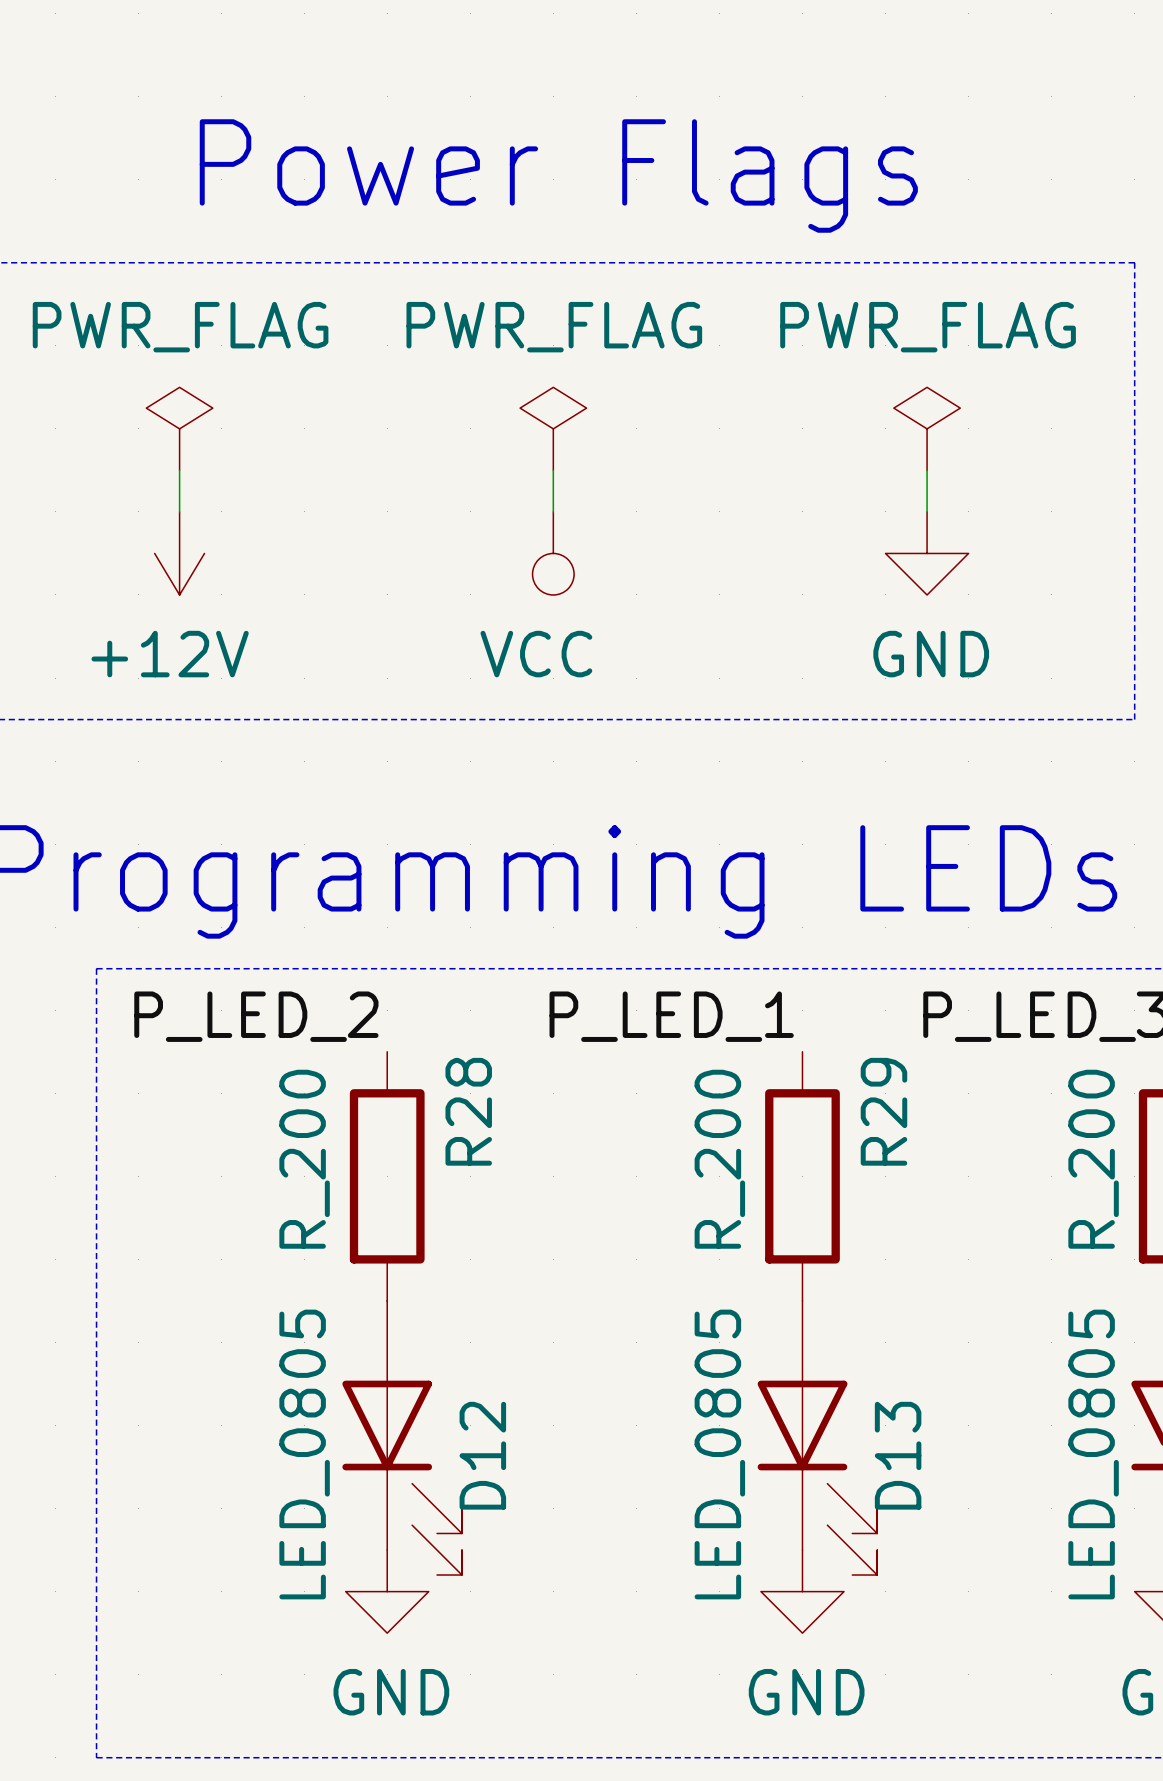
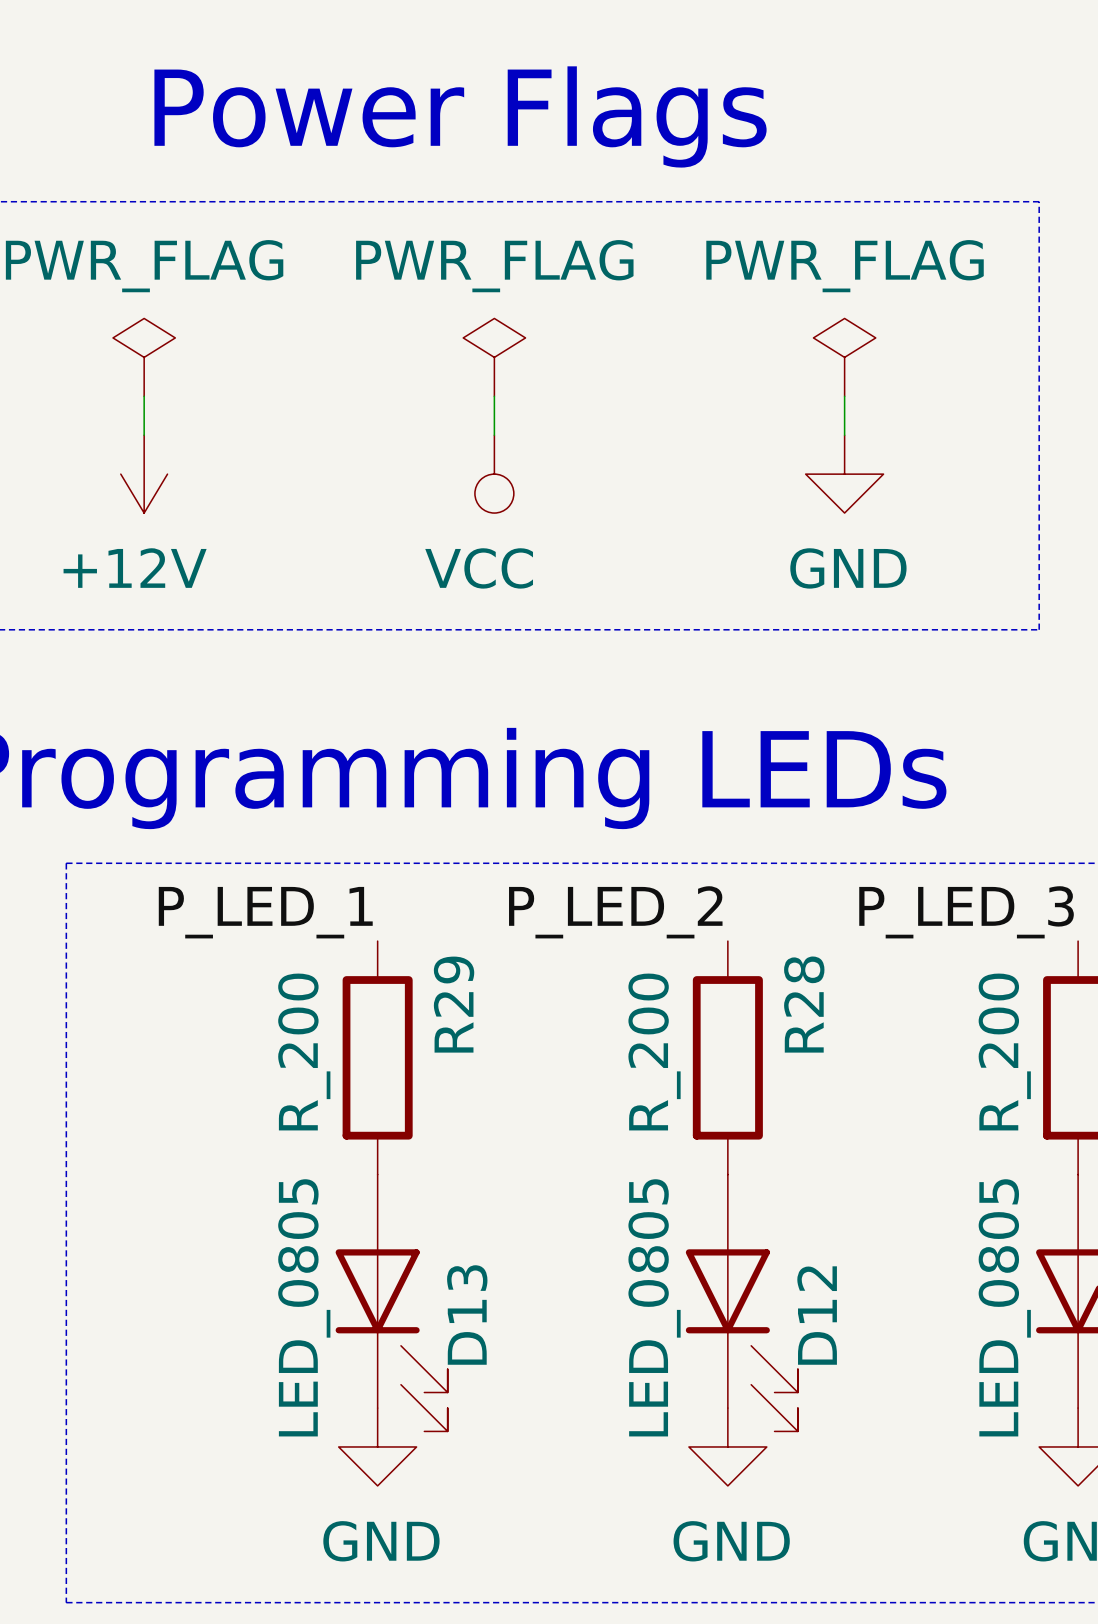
label: P_LED_2 (256, 1016) -> P_LED_1 (265, 912)
label: P_LED_1 (671, 1016) -> P_LED_2 (615, 912)
R29 name: R29 (883, 1111) -> R28 (804, 1004)
R28: R_200 (387, 1176) -> none
R29: none -> R_200 (377, 1057)
D12: LED_0805 (402, 1437) -> none
D13: none -> LED_0805 (391, 1303)
D13 name: D13 (898, 1455) -> D12 (817, 1315)
power symbol position: GND (387, 1591) -> GND (377, 1446)

